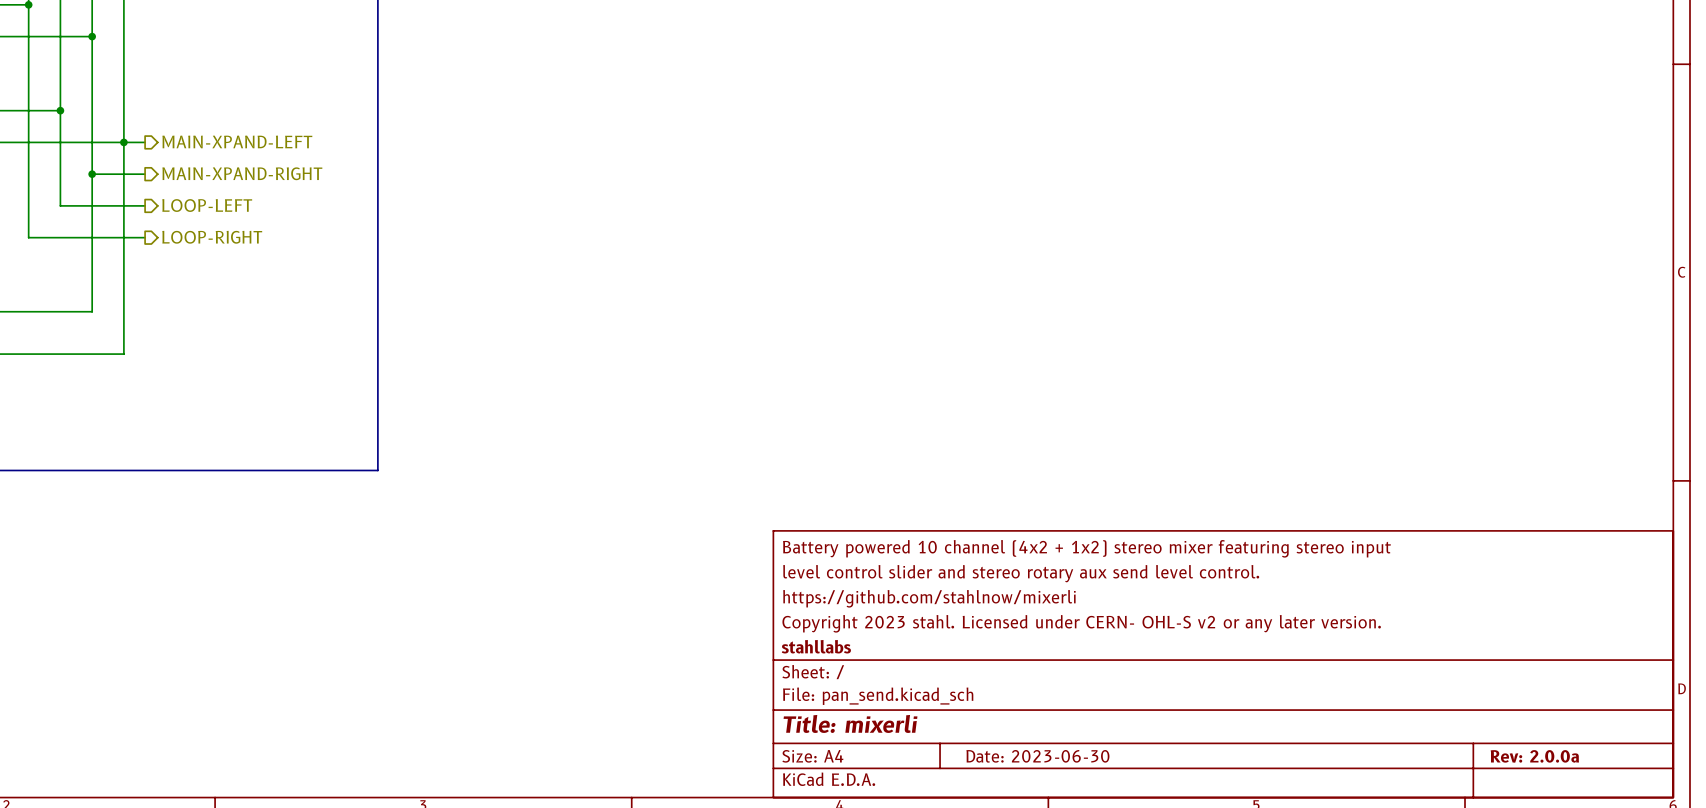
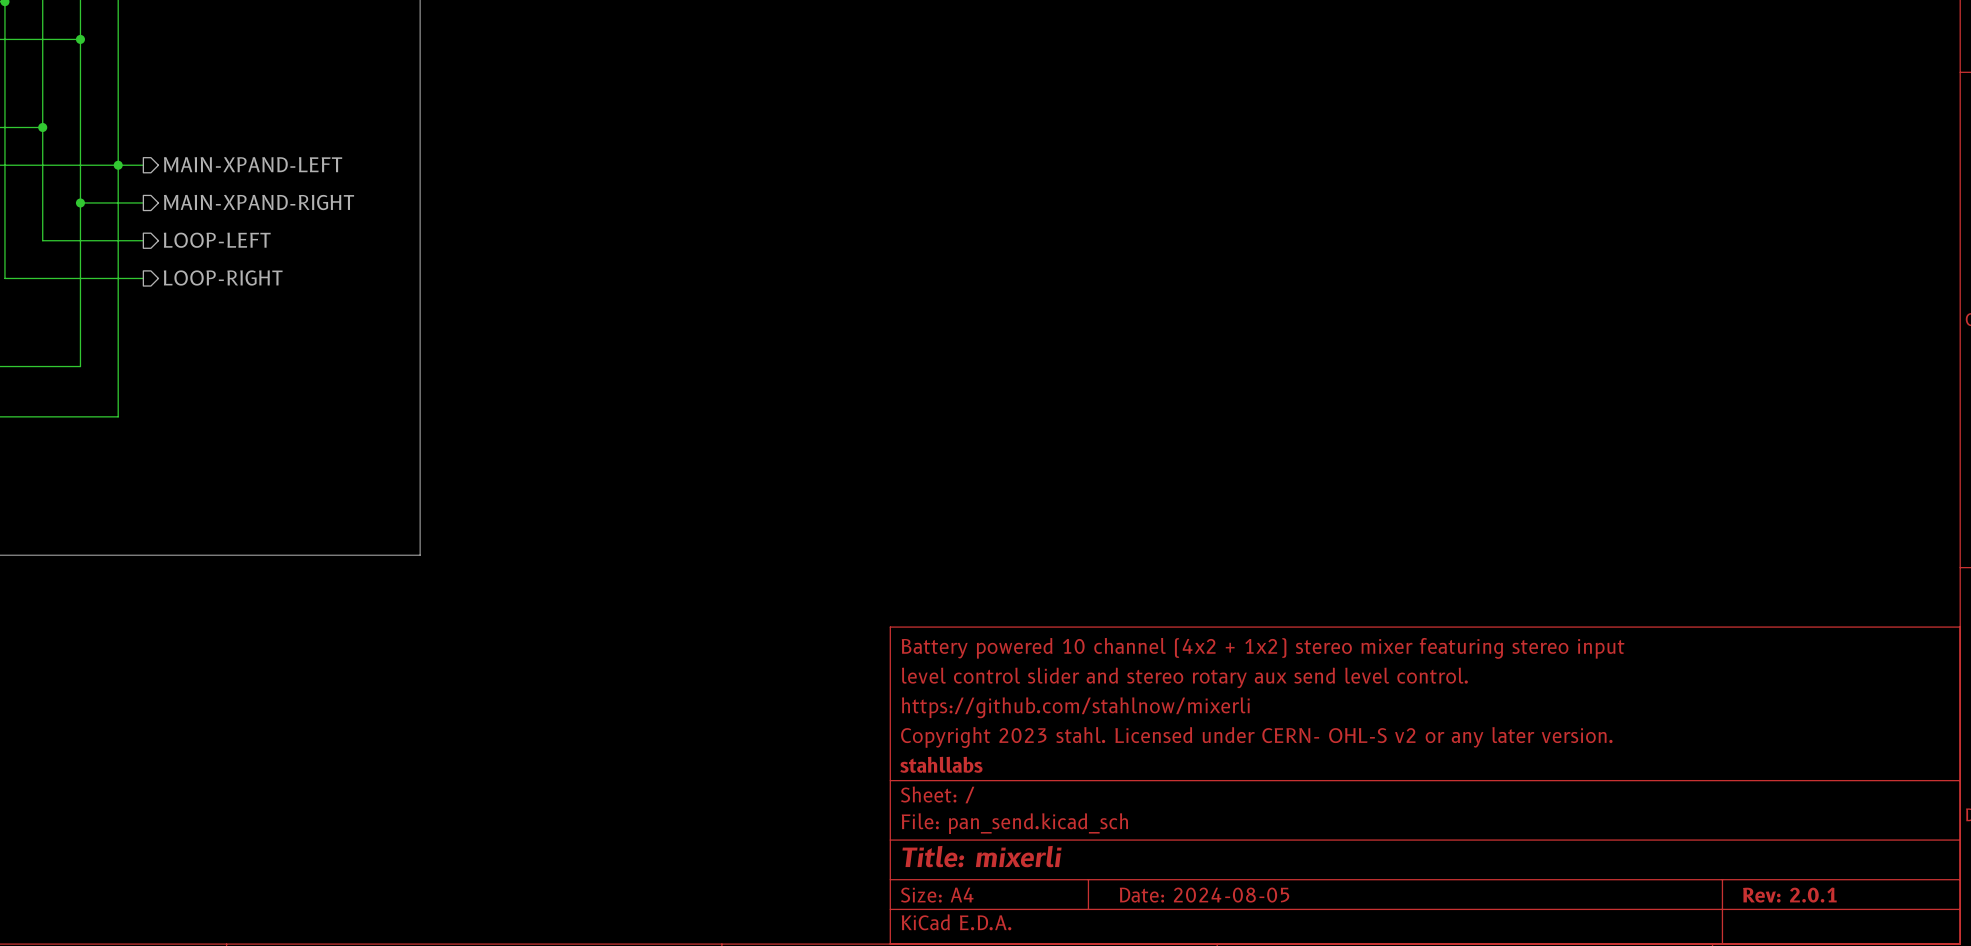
title block: Date: 2023-06-30 (1037, 756) -> Date: 2024-08-05 (1204, 895)
title block: Rev: 2.0.0a (1534, 756) -> Rev: 2.0.1 (1789, 895)

